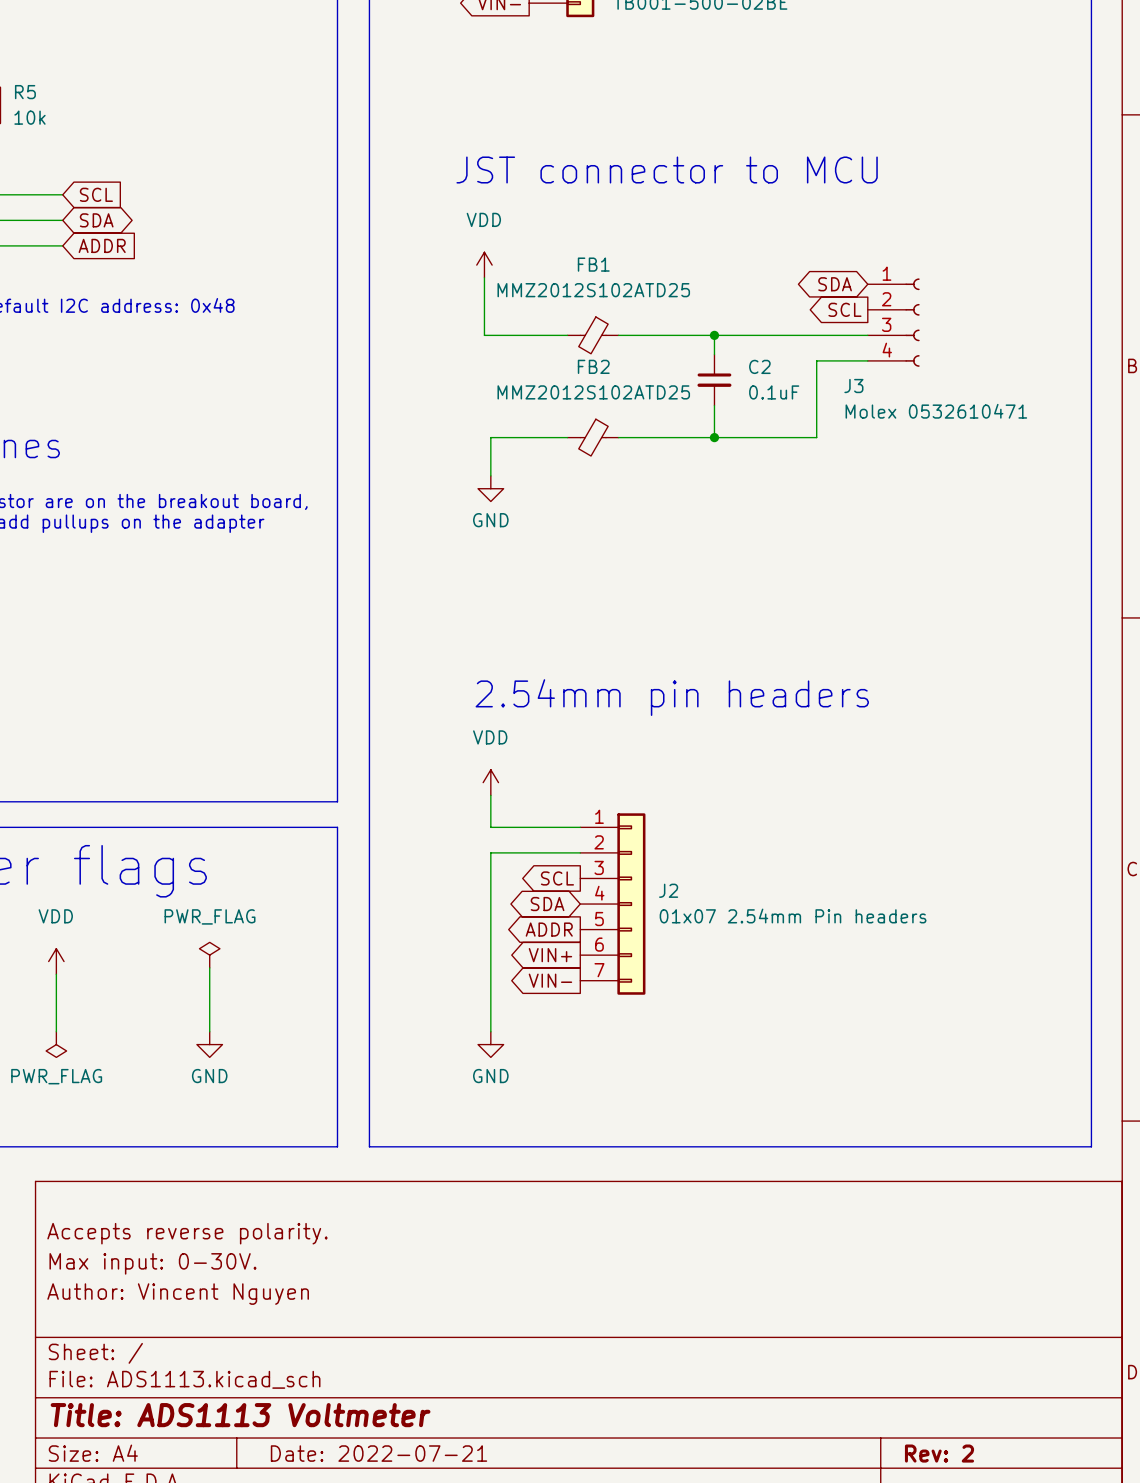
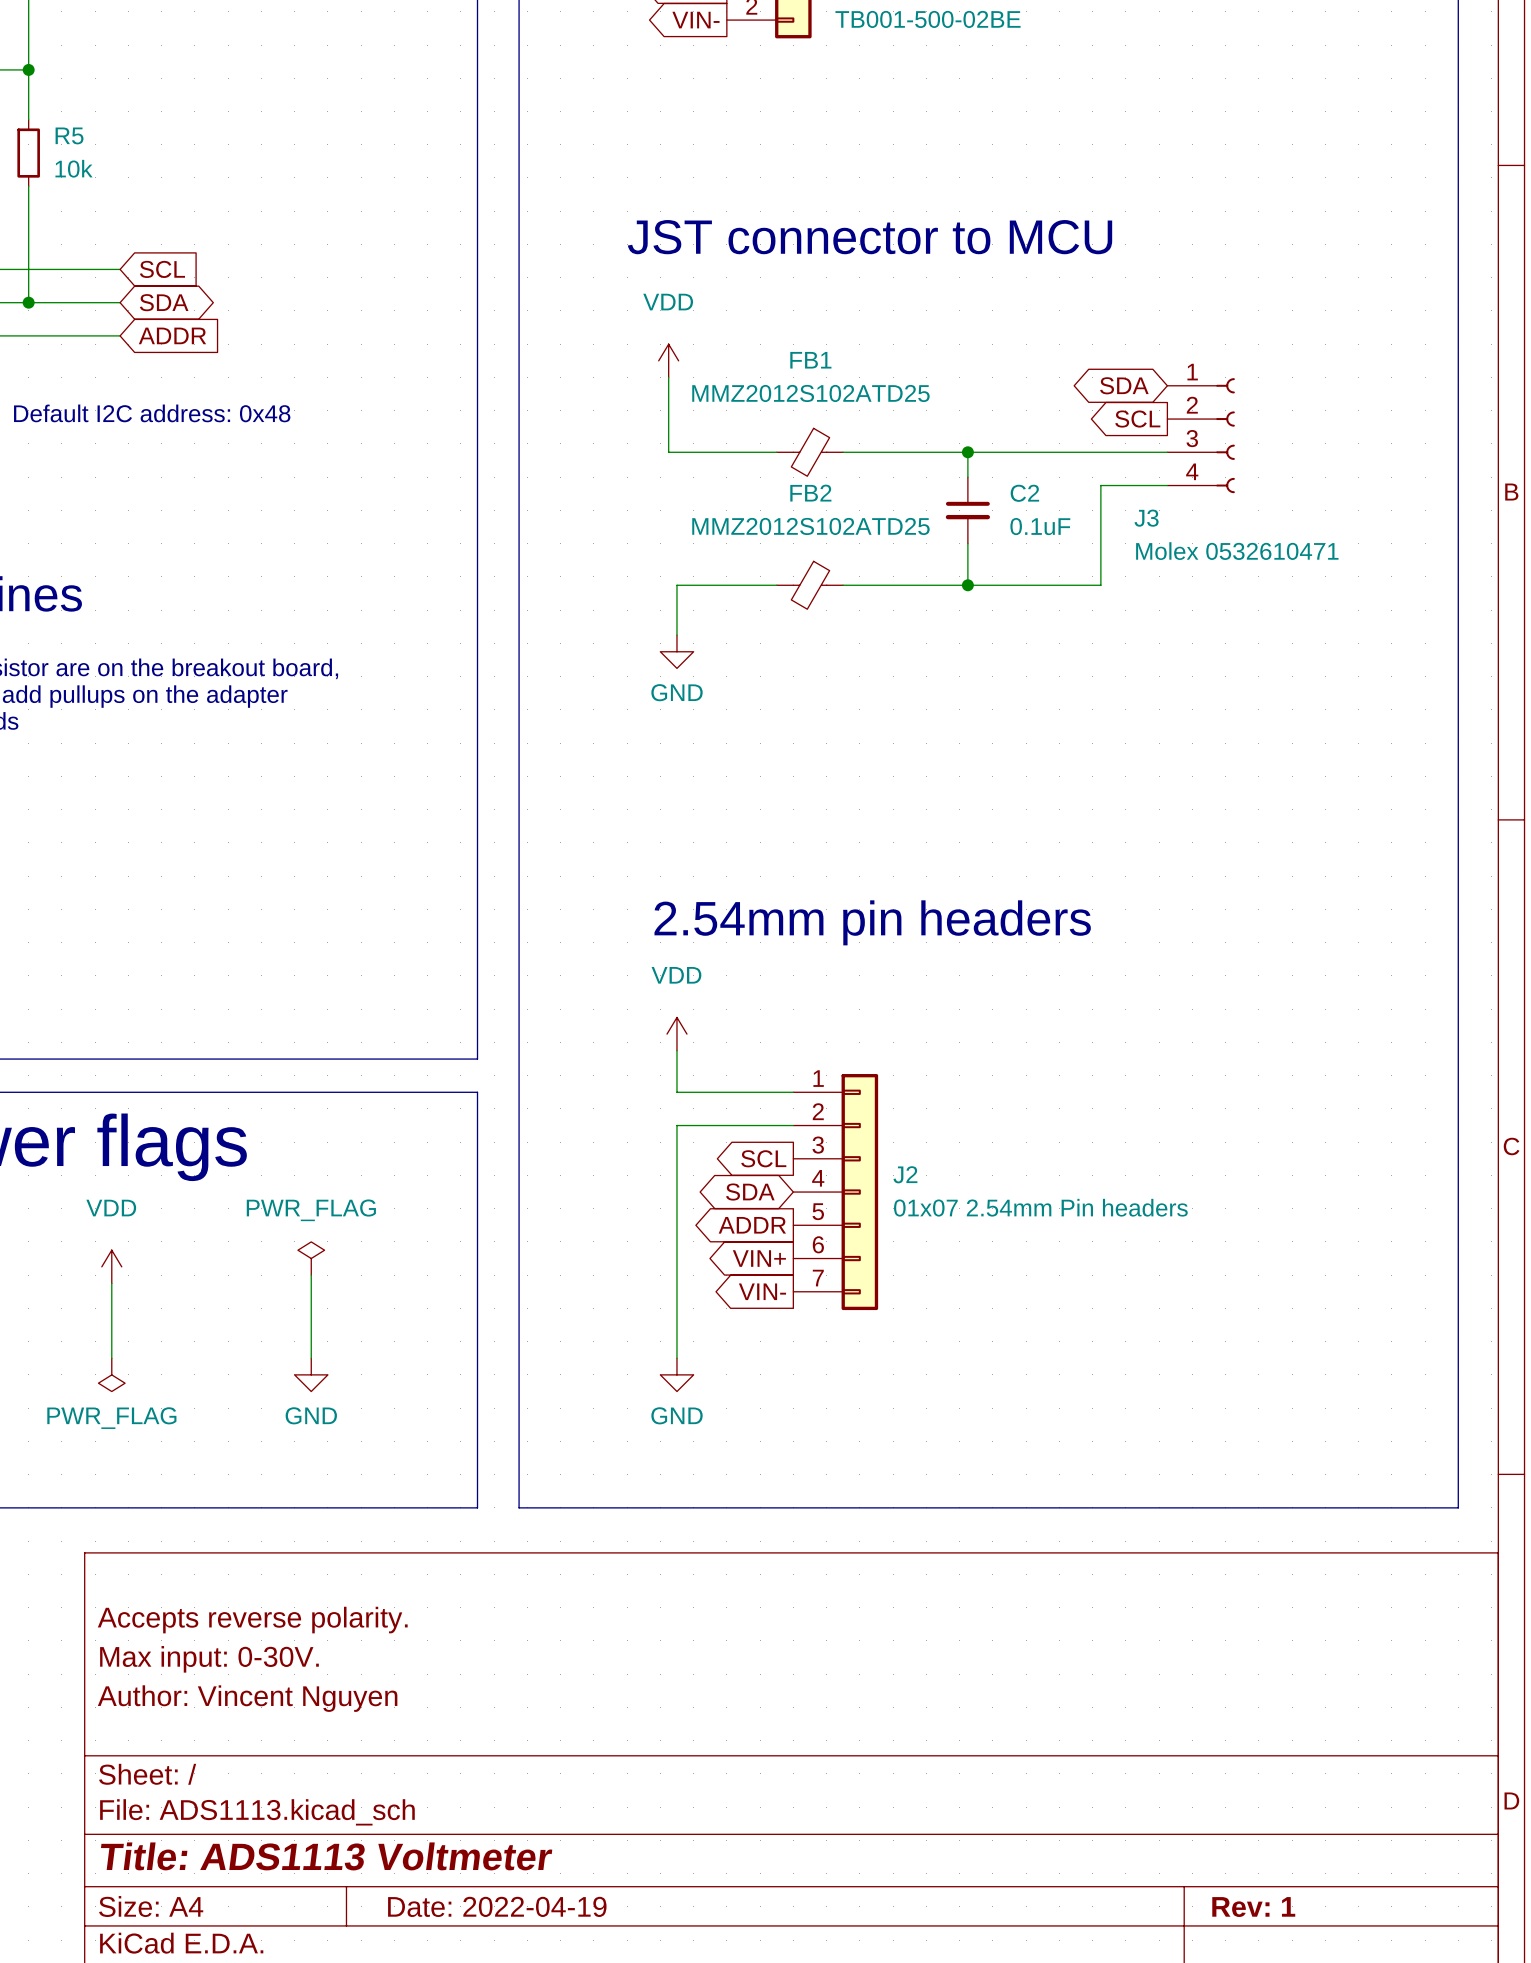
title block: Date: 2022-07-21 (379, 1453) -> Date: 2022-04-19 (497, 1906)
title block: Rev: 2 (939, 1453) -> Rev: 1 (1253, 1907)

